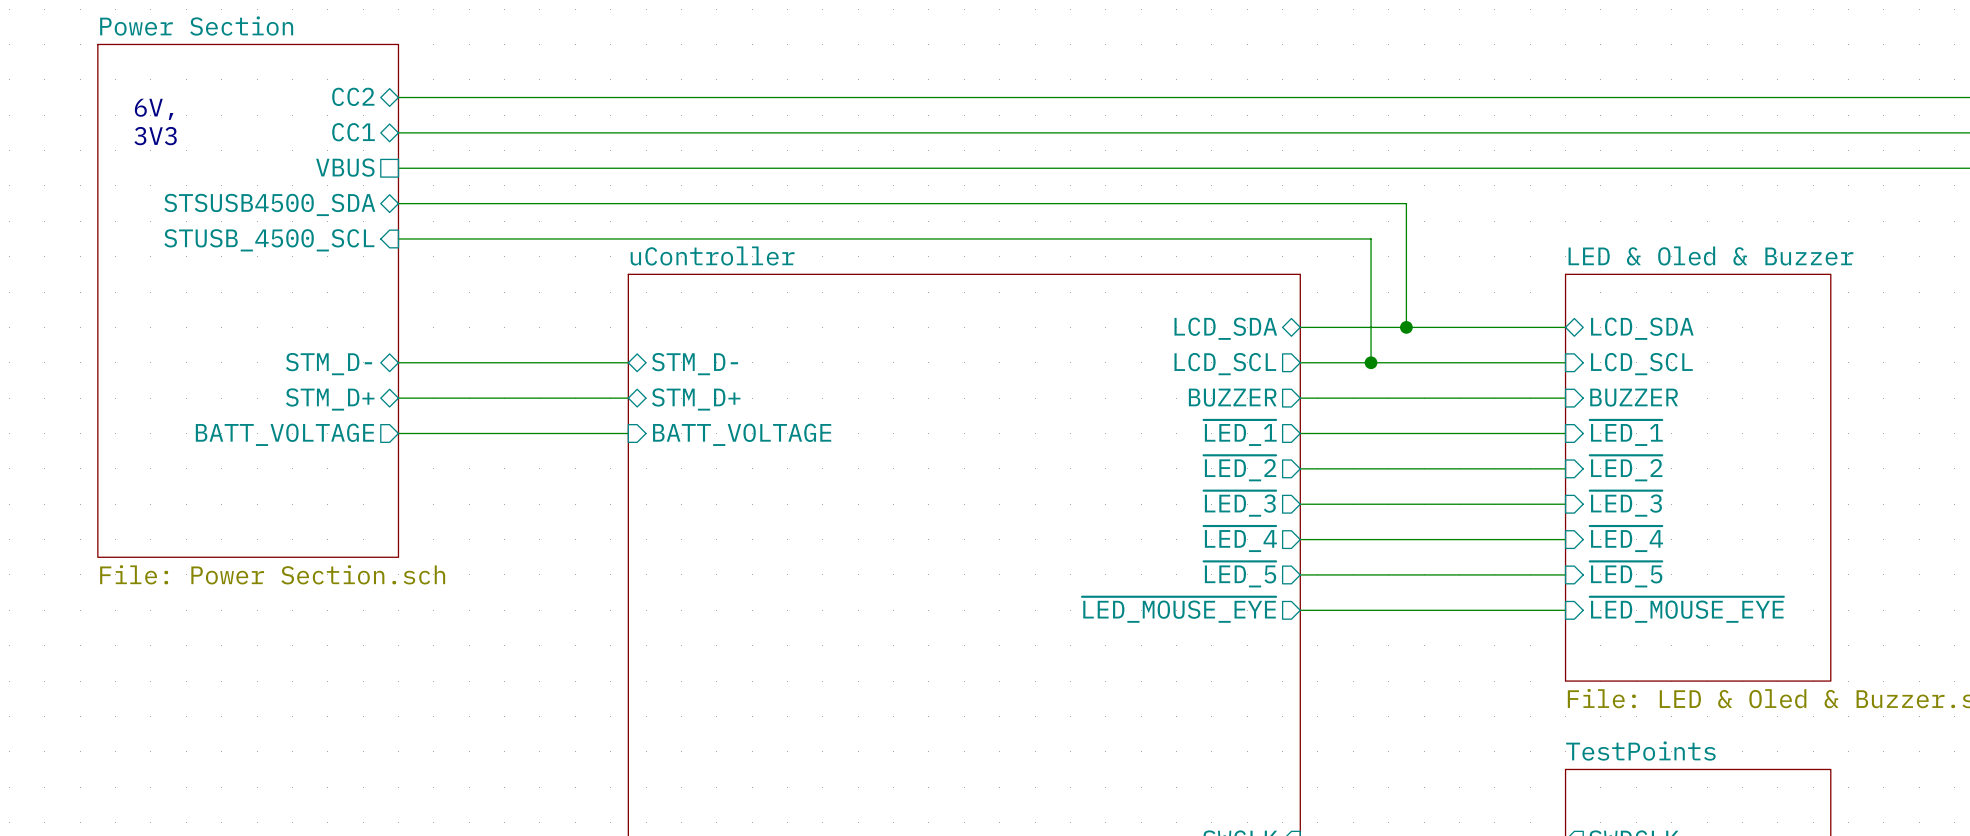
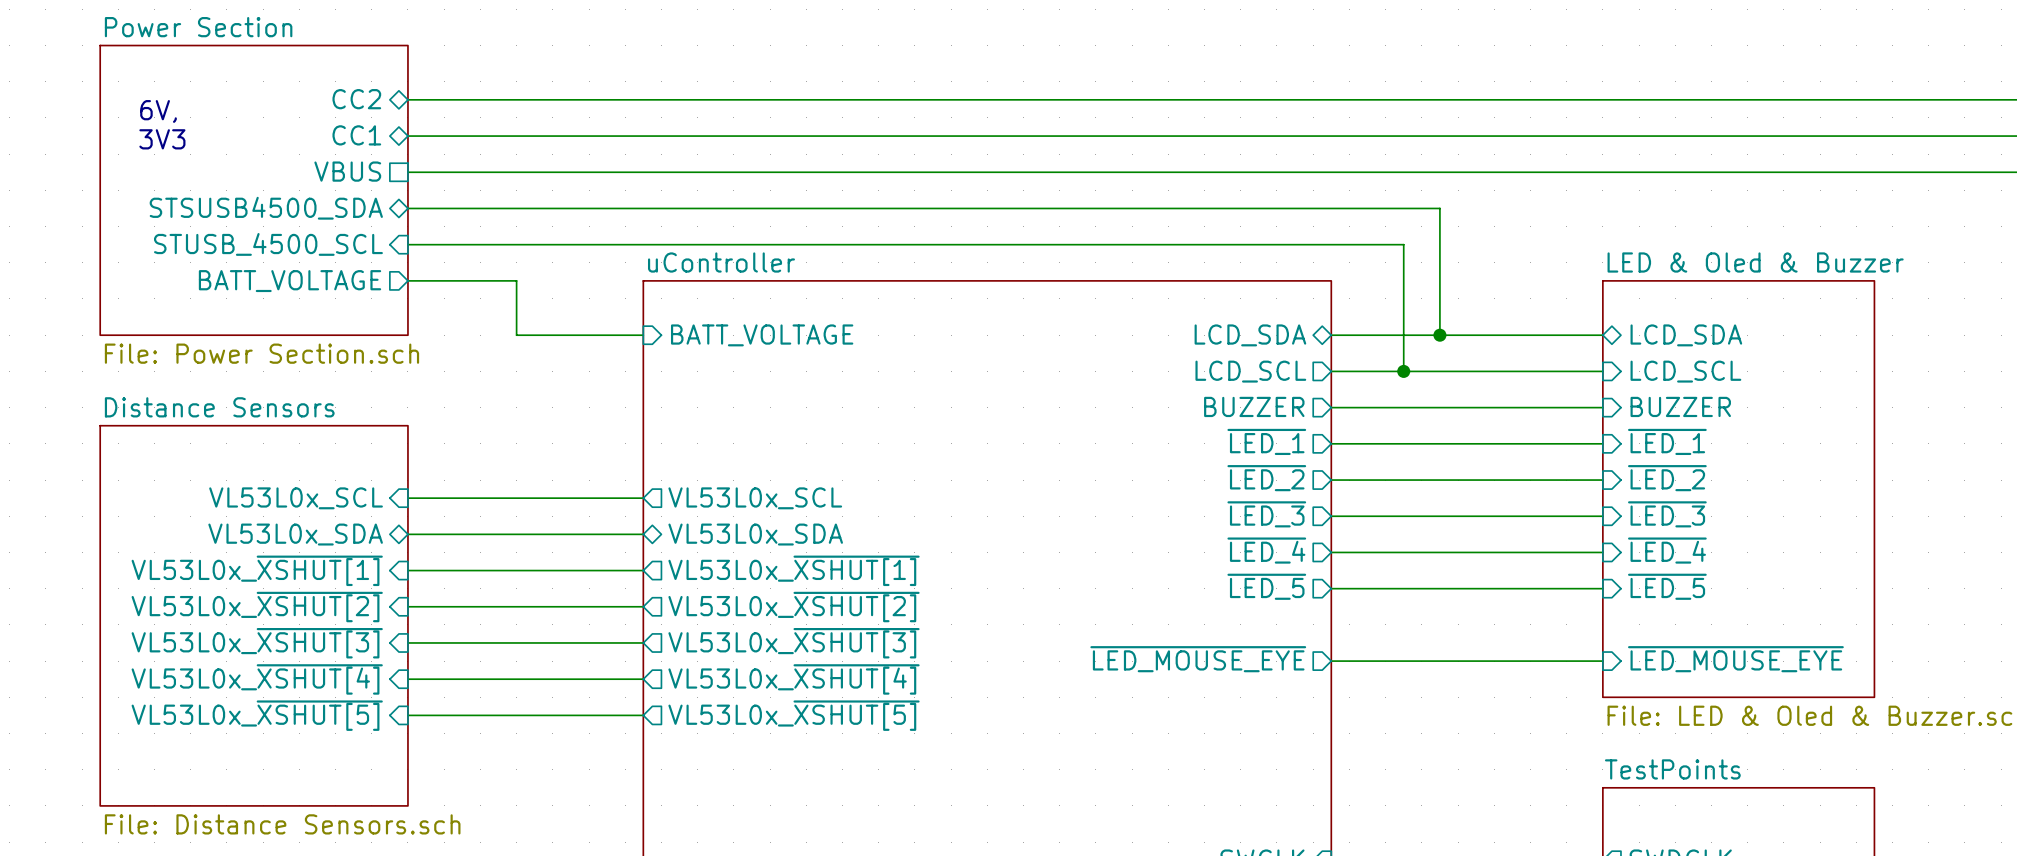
sheet Power Section: none -> File: Power Section.sch (254, 190)
wire: none -> (407, 280) (516, 280) (516, 335) (643, 335)
sheet pin: none -> BATT_VOLTAGE (290, 281)
sheet Power Section: File: Power Section.sch (248, 300) -> none
wire: (398, 362) (628, 362) -> (407, 498) (643, 498)
sheet pin: STM_D- (329, 364) -> none
sheet pin: STM_D- (695, 364) -> none
wire: (398, 398) (628, 398) -> (407, 534) (643, 534)
sheet pin: STM_D+ (330, 399) -> none
sheet pin: STM_D+ (696, 399) -> none
wire: (398, 433) (628, 433) -> (407, 570) (643, 570)
sheet pin: BATT_VOLTAGE (284, 434) -> none
sheet pin position: BATT_VOLTAGE (742, 434) -> BATT_VOLTAGE (762, 335)
sheet pin: none -> VL53L0x_SCL (296, 498)
sheet pin: none -> VL53L0x_SCL (755, 498)
sheet pin: none -> VL53L0x_SDA (295, 534)
sheet pin: none -> VL53L0x_SDA (755, 534)
sheet pin: none -> VL53L0x_~{XSHUT[1]} (257, 570)
sheet pin: none -> VL53L0x_~{XSHUT[1]} (794, 570)
sheet pin: none -> VL53L0x_~{XSHUT[2]} (257, 607)
wire: none -> (407, 606) (643, 606)
sheet pin: none -> VL53L0x_~{XSHUT[2]} (794, 607)
sheet Distance Sensors: none -> File: Distance Sensors.sch (254, 615)
sheet pin position: ~{LED_MOUSE_EYE} (1179, 609) -> ~{LED_MOUSE_EYE} (1198, 659)
sheet pin position: ~{LED_MOUSE_EYE} (1686, 609) -> ~{LED_MOUSE_EYE} (1735, 659)
wire: (1300, 610) (1565, 610) -> (1331, 661) (1602, 661)
sheet pin: none -> VL53L0x_~{XSHUT[3]} (257, 643)
sheet pin: none -> VL53L0x_~{XSHUT[3]} (794, 643)
wire: none -> (407, 642) (643, 642)
sheet pin: none -> VL53L0x_~{XSHUT[4]} (257, 679)
sheet pin: none -> VL53L0x_~{XSHUT[4]} (794, 679)
wire: none -> (407, 679) (643, 679)
sheet pin: none -> VL53L0x_~{XSHUT[5]} (257, 715)
wire: none -> (407, 715) (643, 715)
sheet pin: none -> VL53L0x_~{XSHUT[5]} (794, 715)

